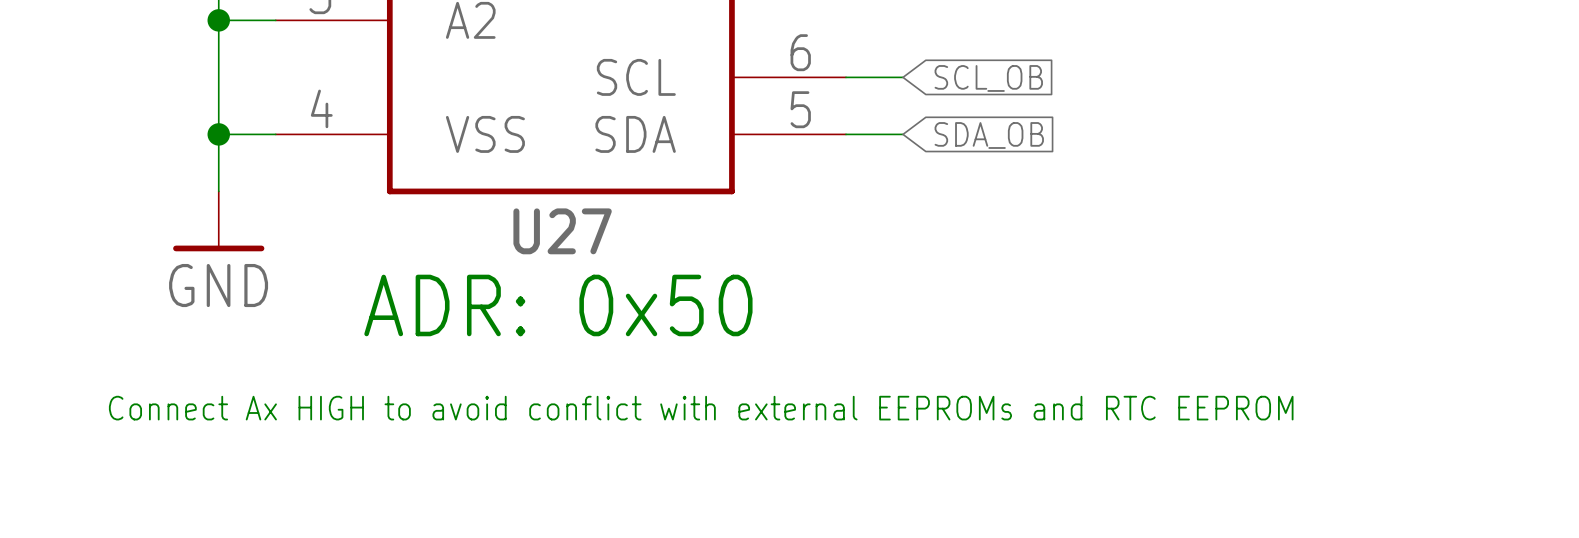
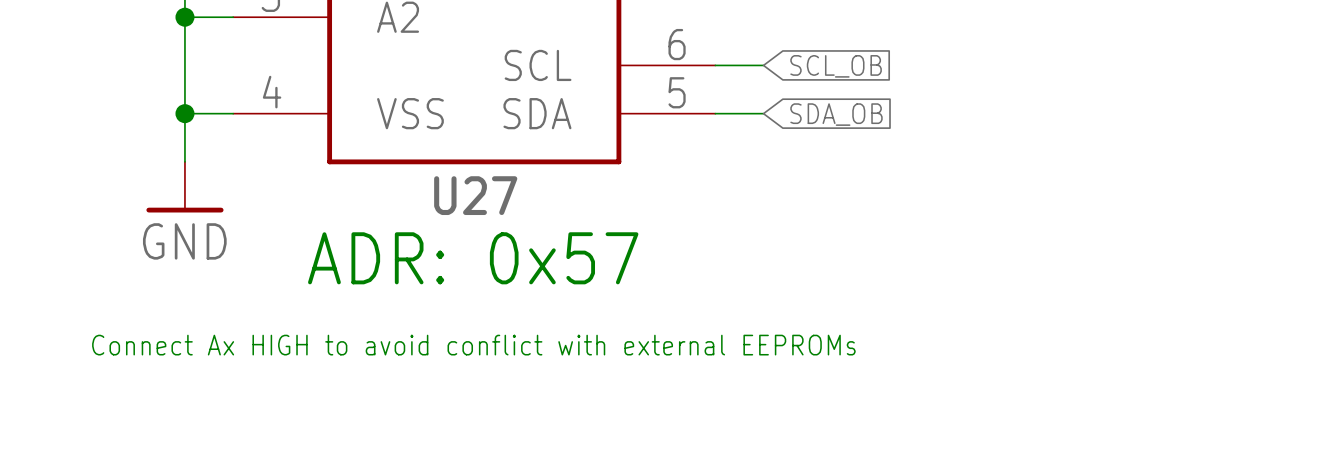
text: ADR: 0x50 (558, 305) -> ADR: 0x57 (473, 258)
text: Connect Ax HIGH to avoid conflict with external EEPROMs and RTC EEPROM (701, 408) -> Connect Ax HIGH to avoid conflict with external EEPROMs (473, 345)

